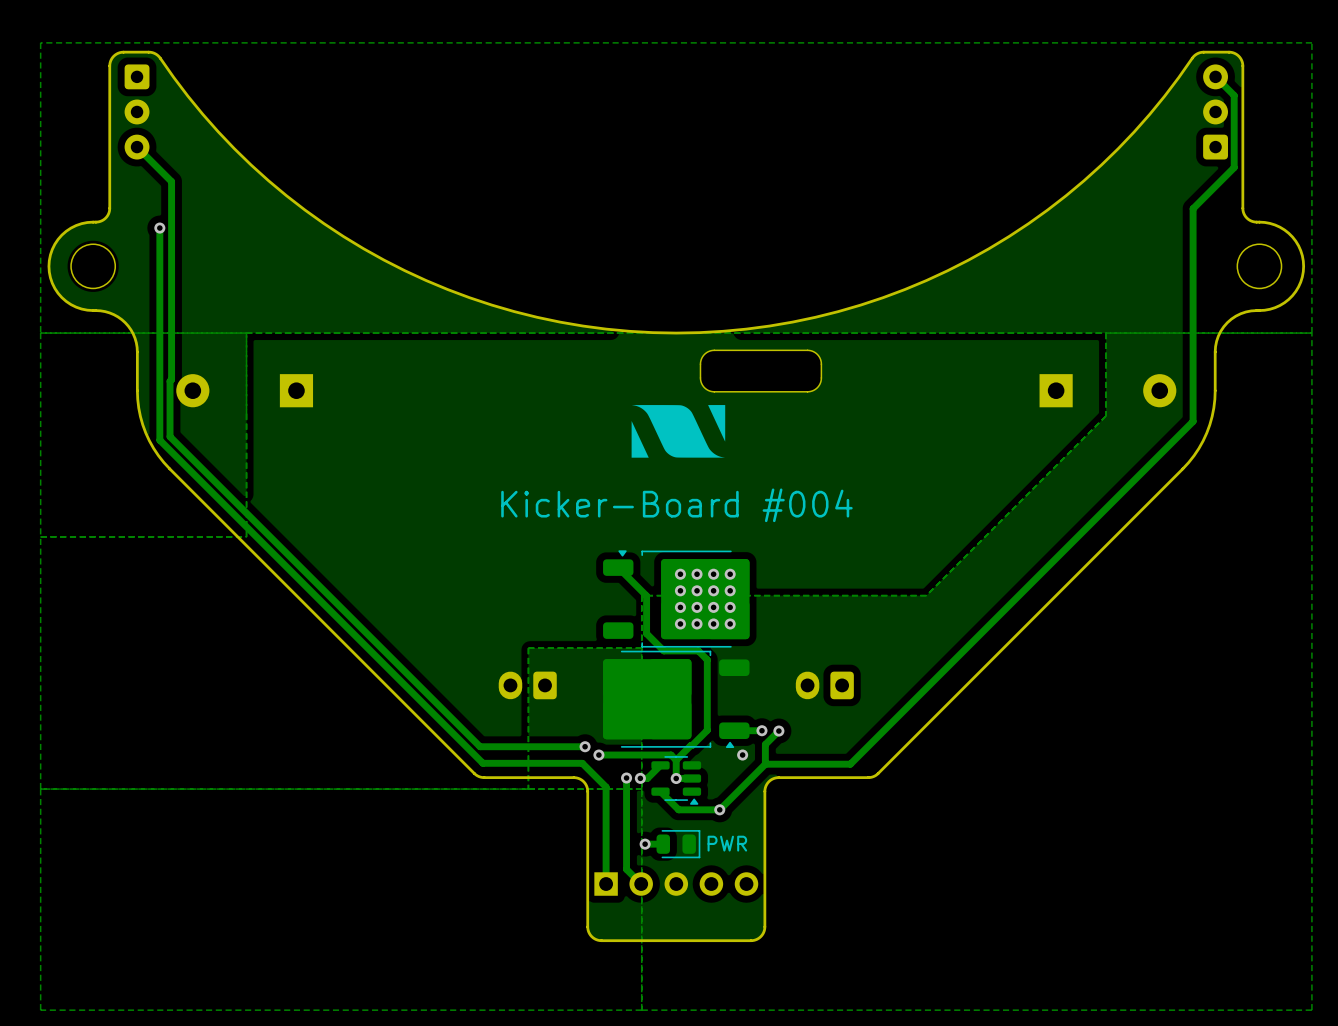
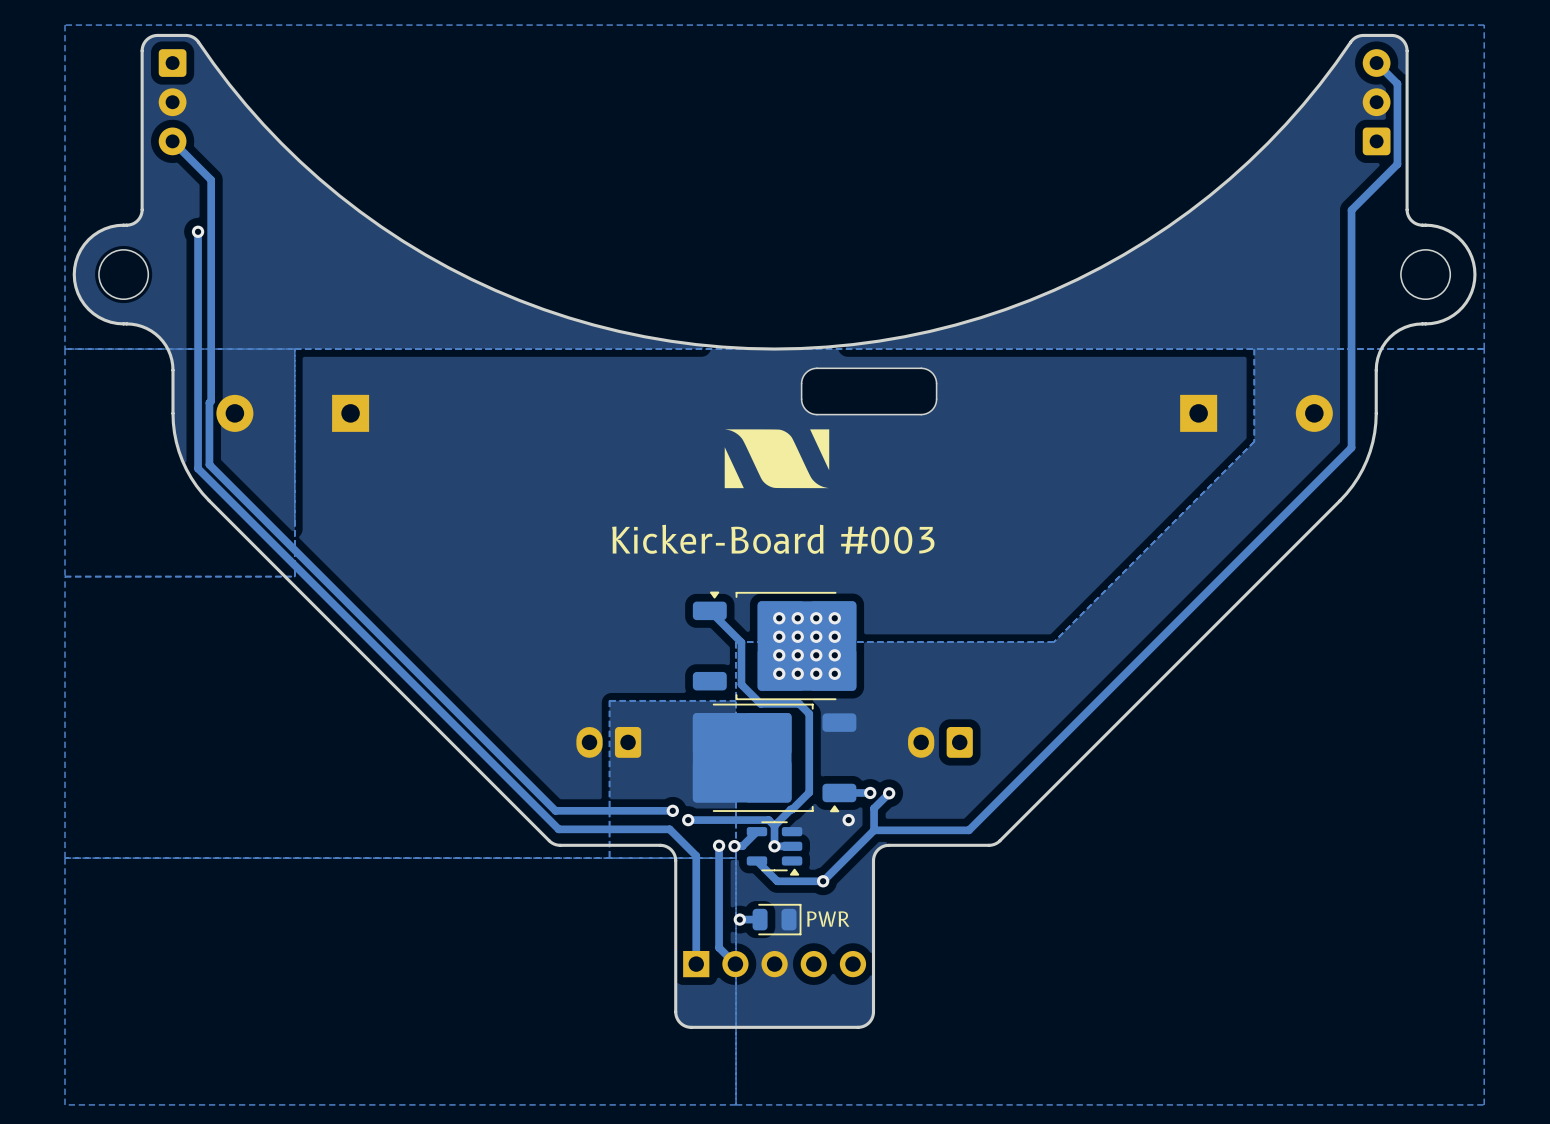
text: Kicker-Board #004 (676, 505) -> Kicker-Board #003 (773, 539)

